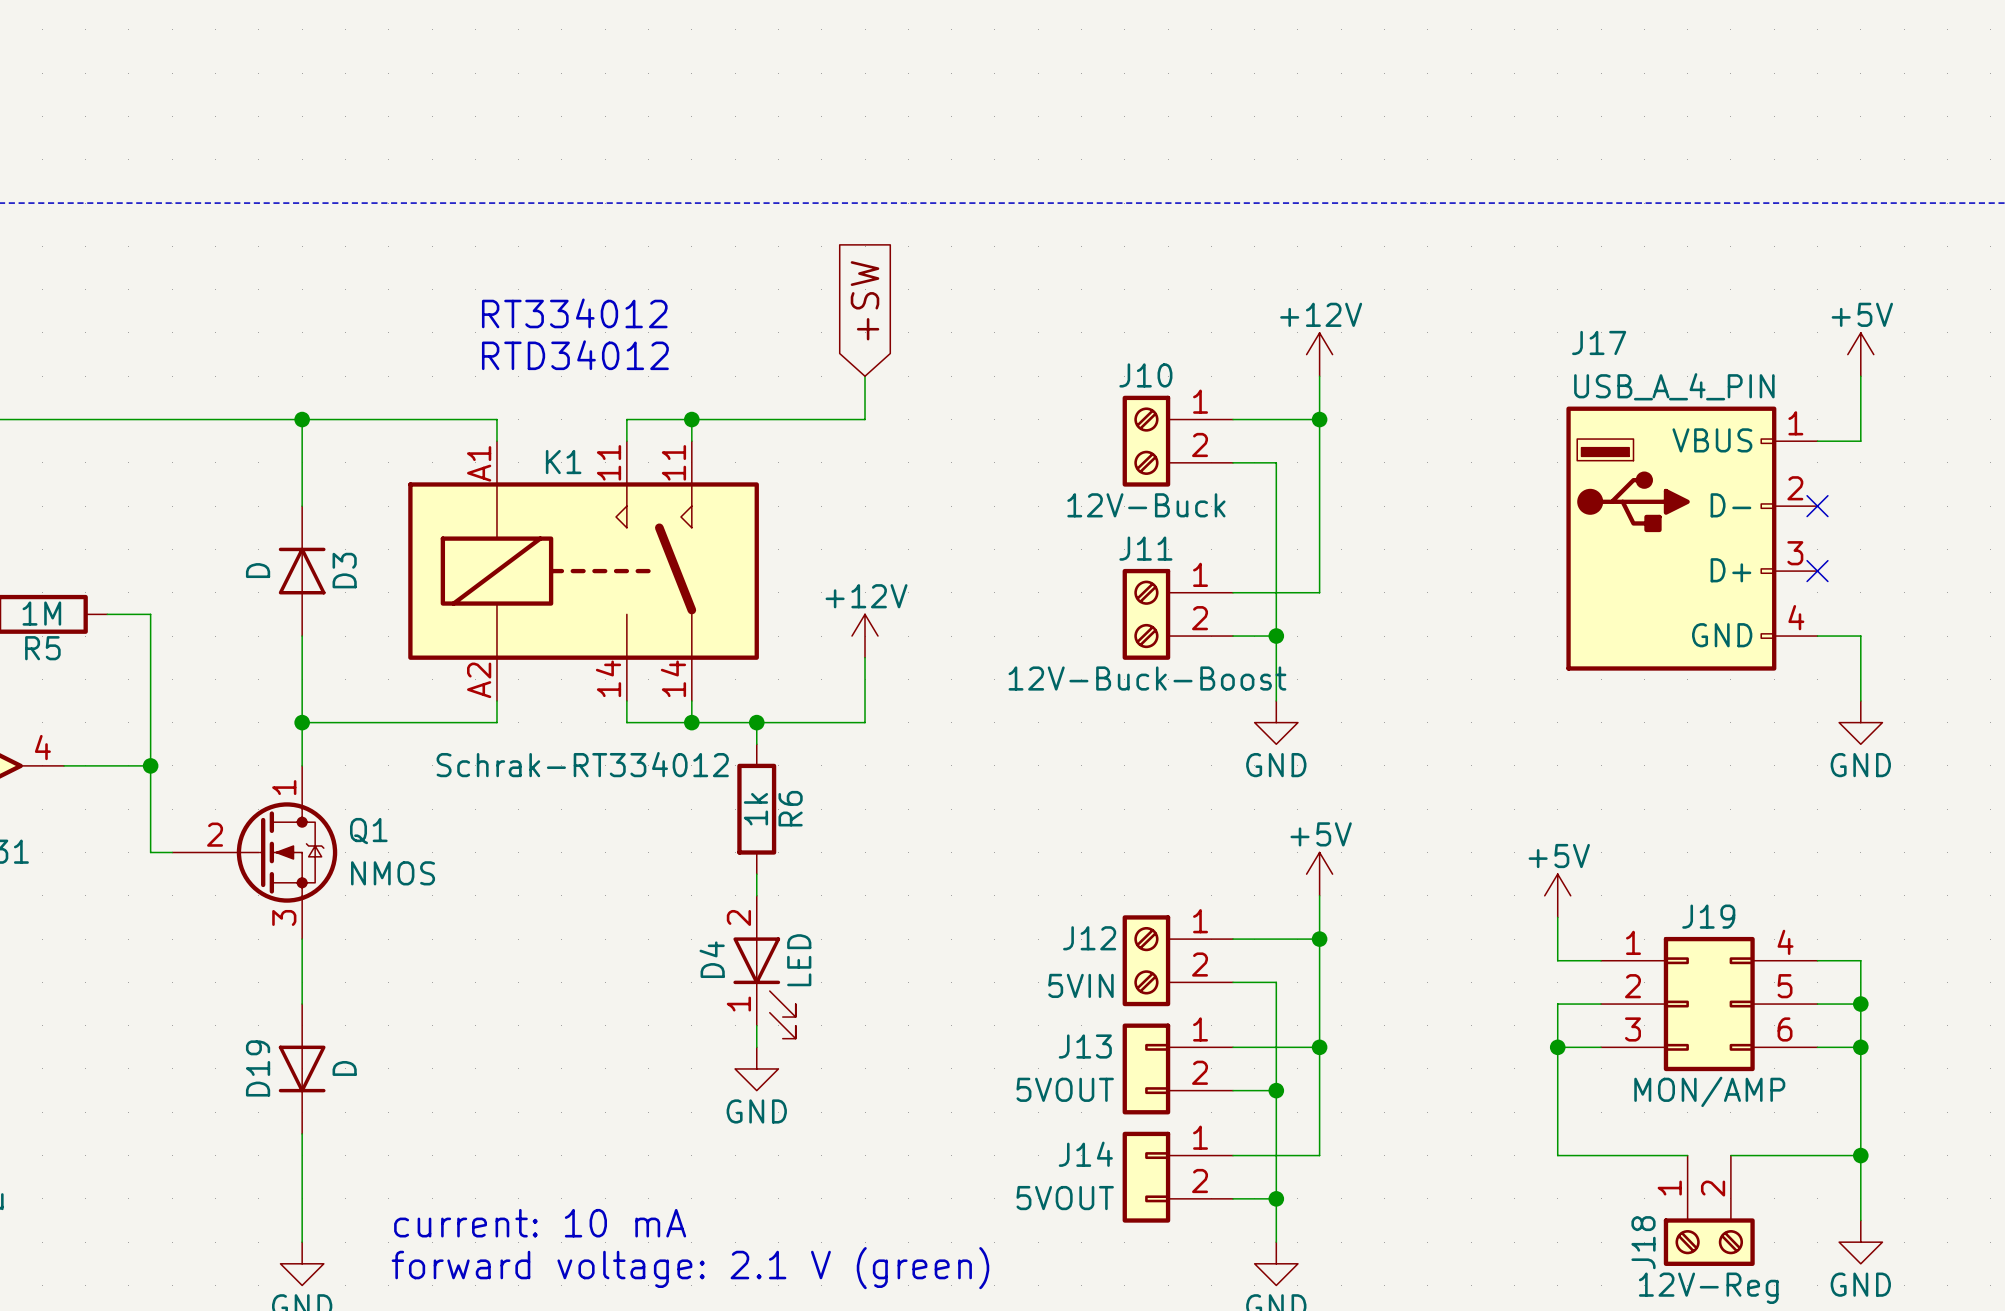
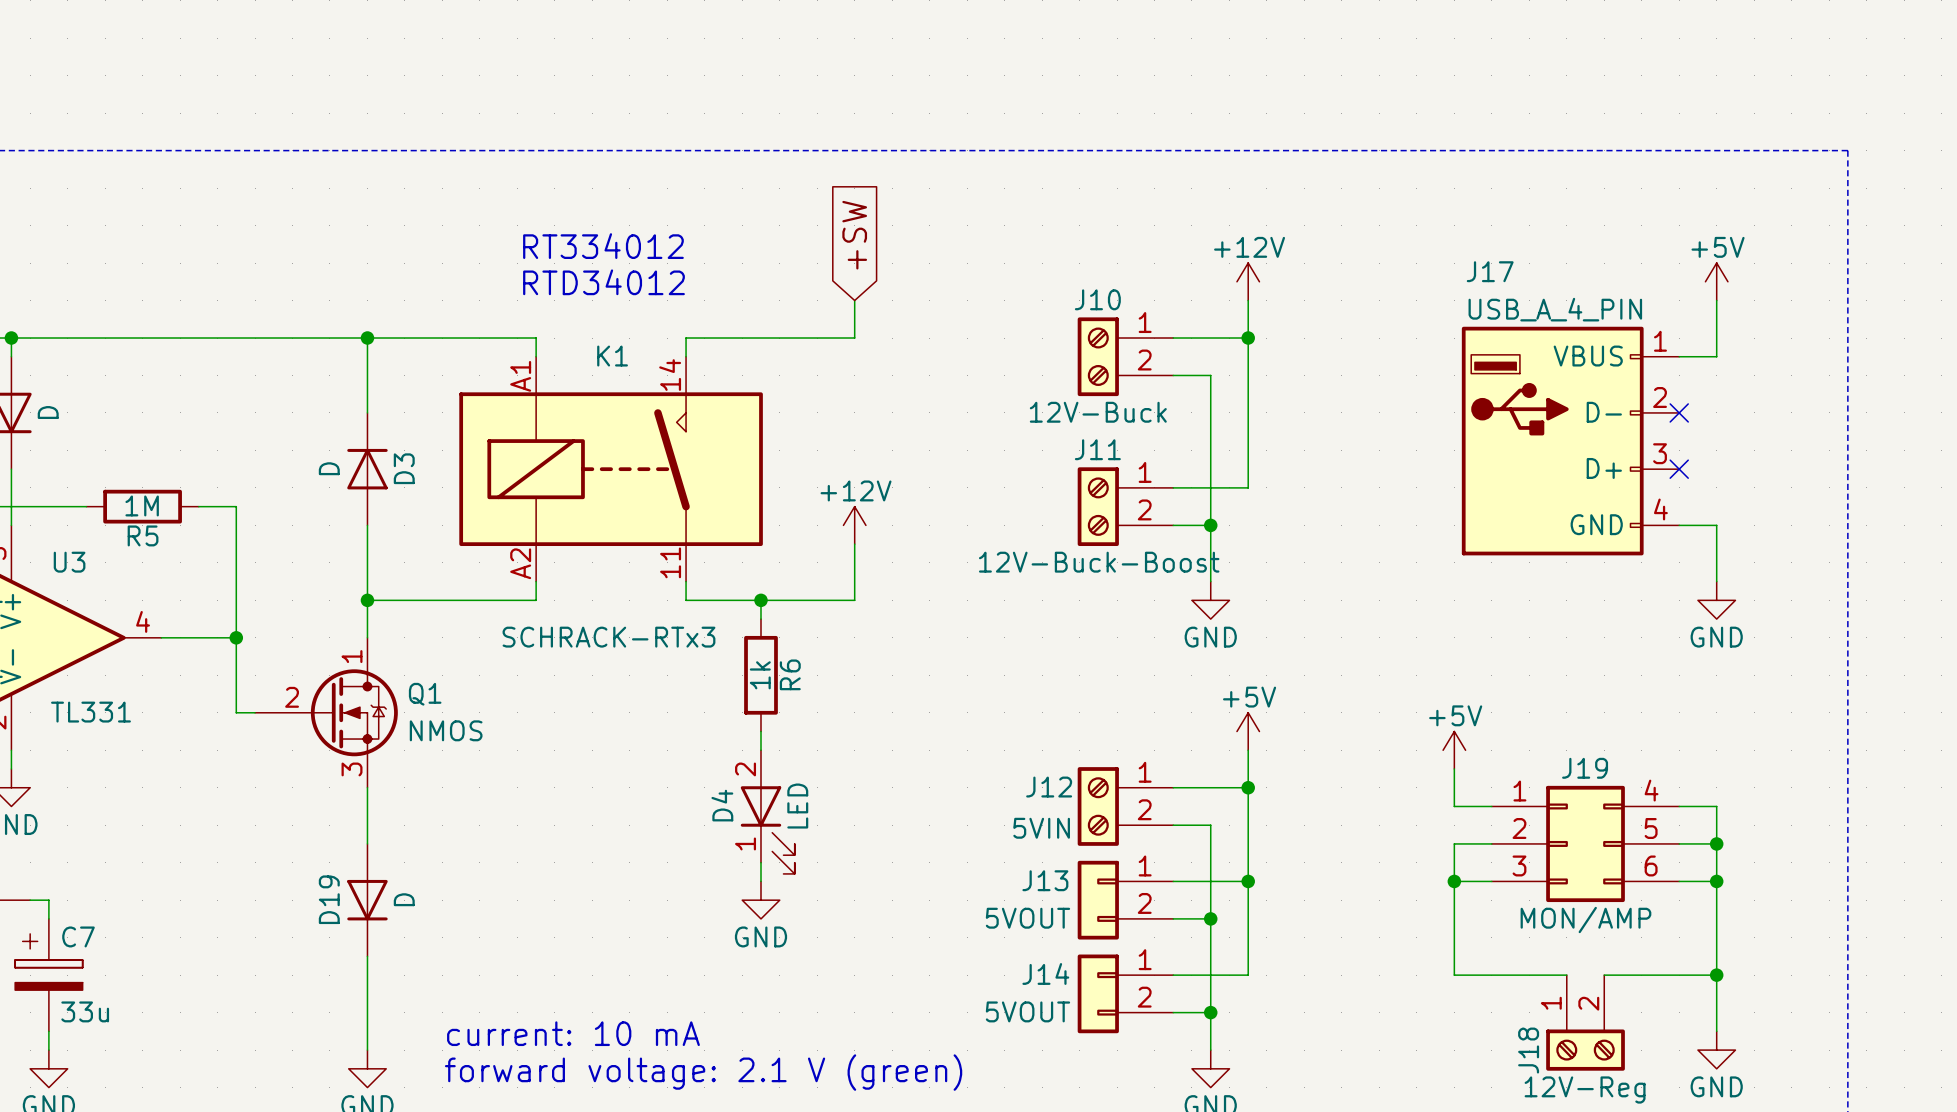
wire: (670, 419) (626, 419) (626, 441) -> (686, 338) (686, 356)
wire: (691, 419) (691, 441) -> none
junction: (691, 419) -> none
K1 symbol: [408, 441, 759, 701] -> [459, 356, 763, 582]
wire: (626, 700) (626, 722) (670, 722) -> (686, 581) (686, 600)
wire: (691, 700) (691, 722) -> none
junction: (691, 722) -> none
K1 value: Schrak-RT334012 (582, 764) -> SCHRACK-RTx3 (608, 637)

